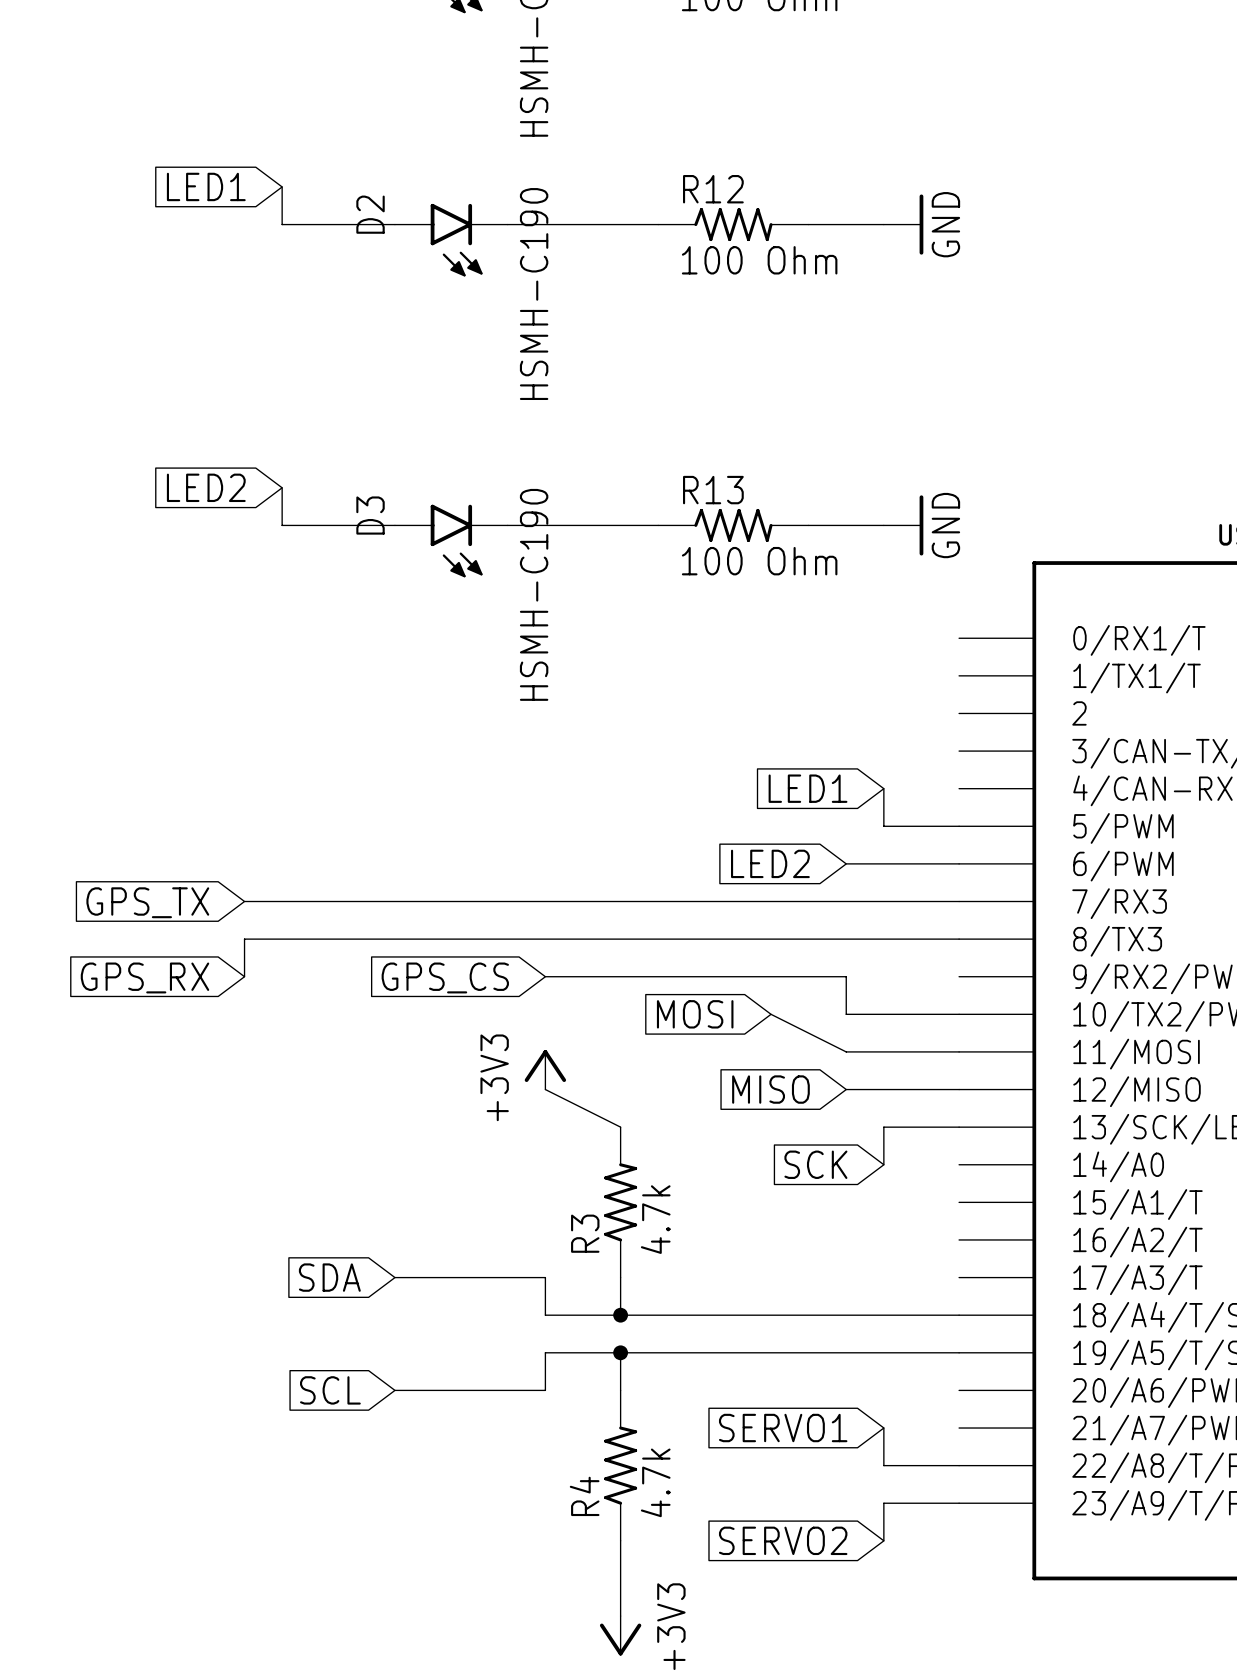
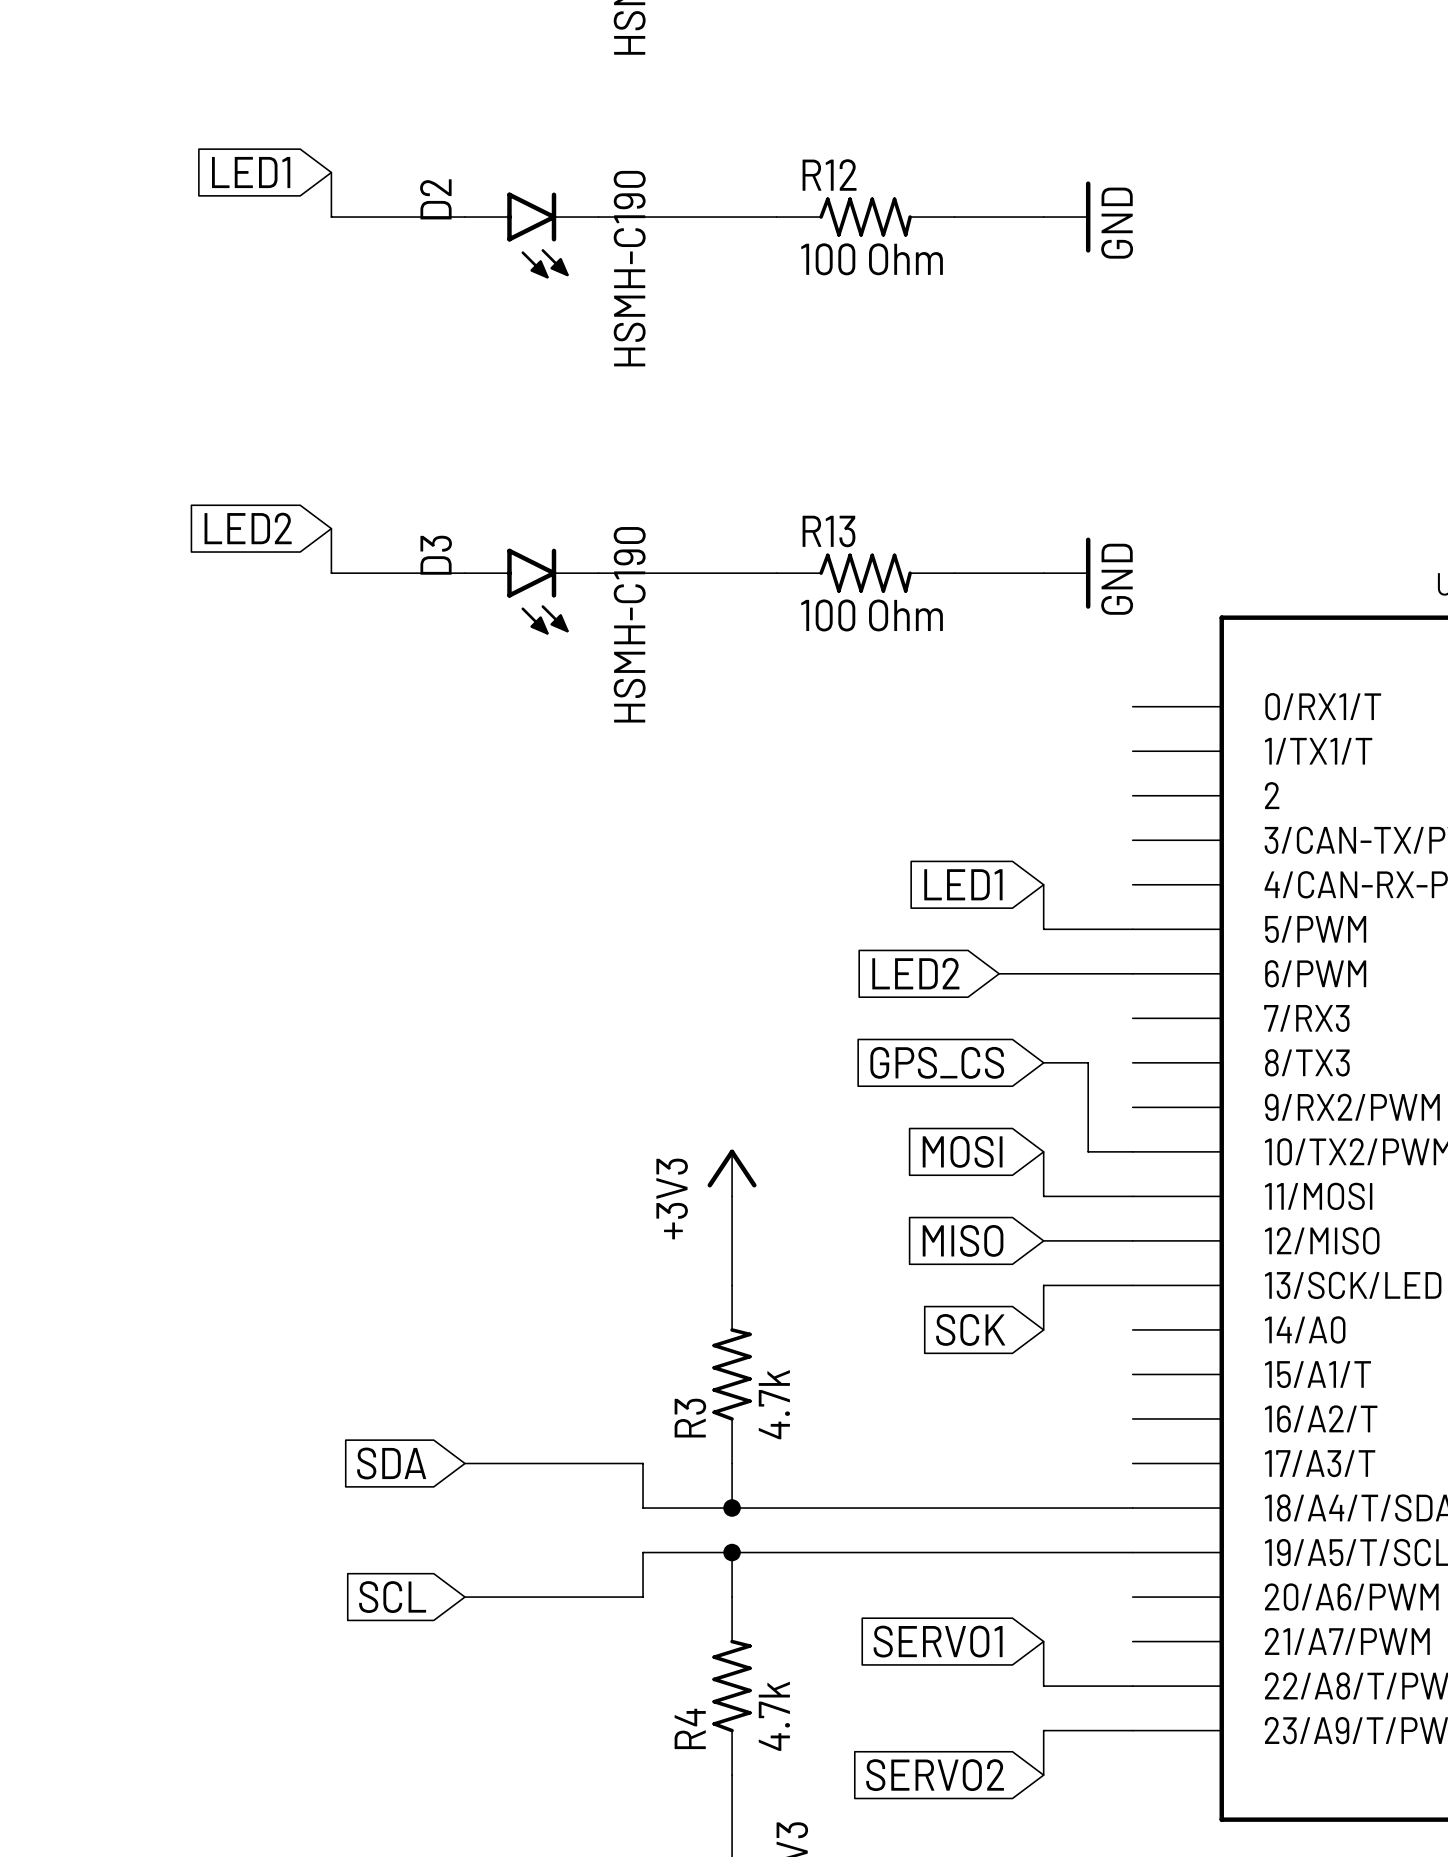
wire: (244, 901) (959, 901) -> none
global label: GPS_TX (147, 902) -> none
wire: (883, 939) (244, 939) (244, 976) -> none
wire: (921, 939) (959, 939) -> (1088, 1062) (1088, 1151)
wire: (545, 976) (846, 976) (846, 1014) (921, 1014) -> none
global label: GPS_RX (144, 977) -> none
global label position: GPS_CS (445, 977) -> GPS_CS (937, 1062)
global label position: MOSI (695, 1014) -> MOSI (962, 1151)
wire: (771, 1014) (846, 1051) (883, 1051) -> (1043, 1151) (1043, 1196)
power symbol position: +3V3 (545, 1069) -> +3V3 (732, 1173)
wire: (545, 1089) (620, 1127) -> (732, 1196) (732, 1285)
global label position: MISO (770, 1089) -> MISO (963, 1240)
wire: (846, 1089) (883, 1089) -> none

